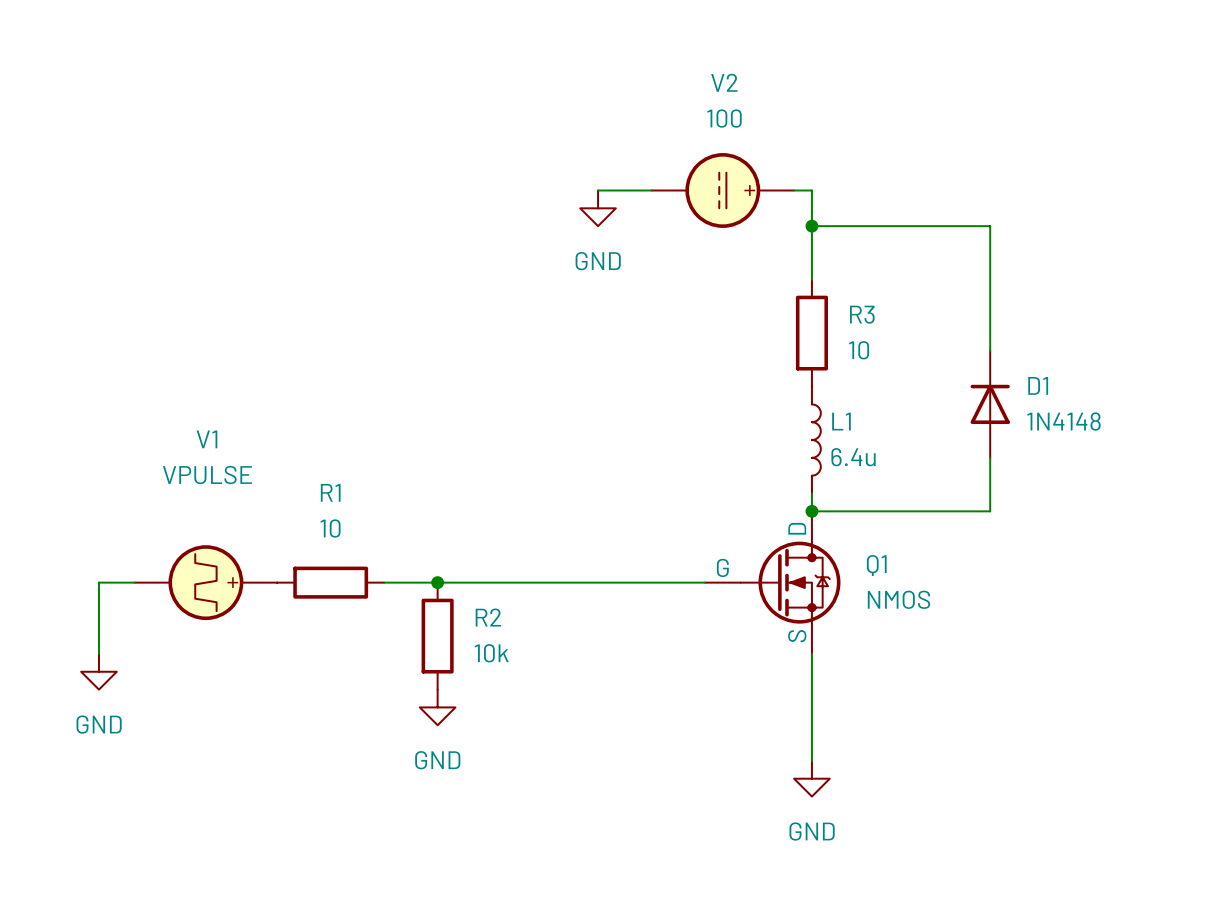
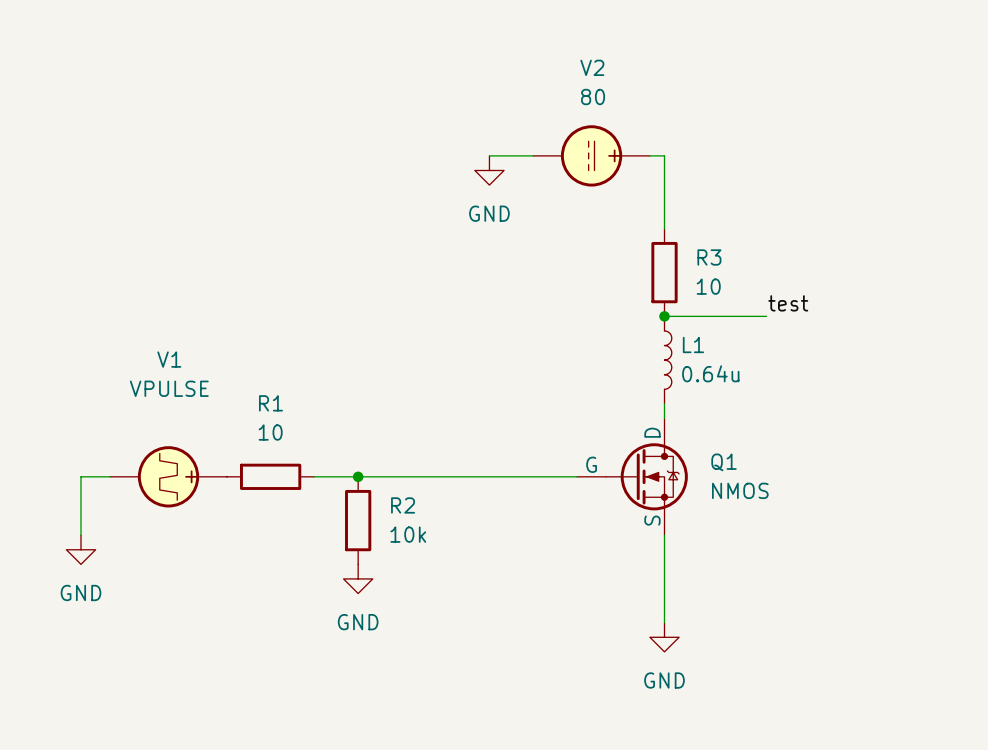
V2 value: 100 (724, 118) -> 80 (593, 97)
wire: (811, 226) (990, 226) (990, 350) -> none
junction: (811, 226) -> none
label: none -> test (788, 303)
wire: none -> (664, 316) (766, 316)
junction: none -> (664, 316)
D1: 1N4148 (990, 404) -> none
L1 value: 6.4u (853, 457) -> 0.64u (710, 373)
wire: (990, 457) (990, 511) (811, 511) -> none
junction: (811, 511) -> none

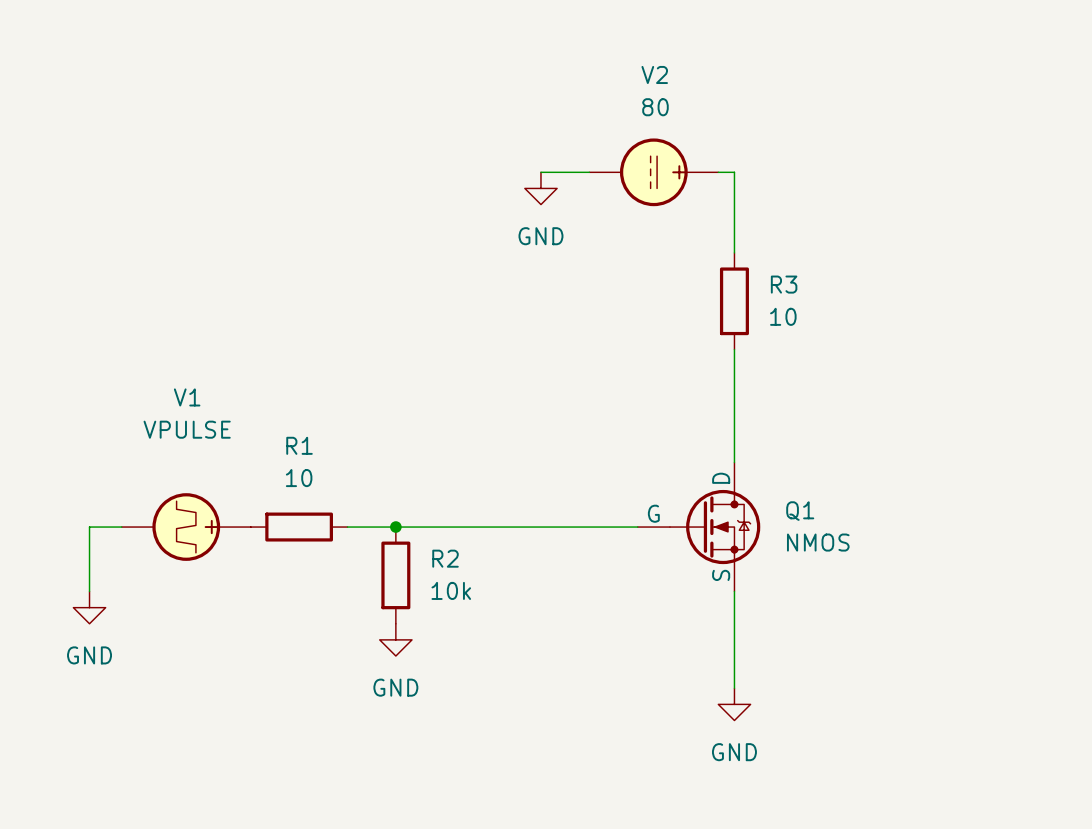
label: test (788, 303) -> none
wire: (664, 316) (766, 316) -> (734, 349) (734, 446)
junction: (664, 316) -> none
L1: 0.64u (668, 360) -> none

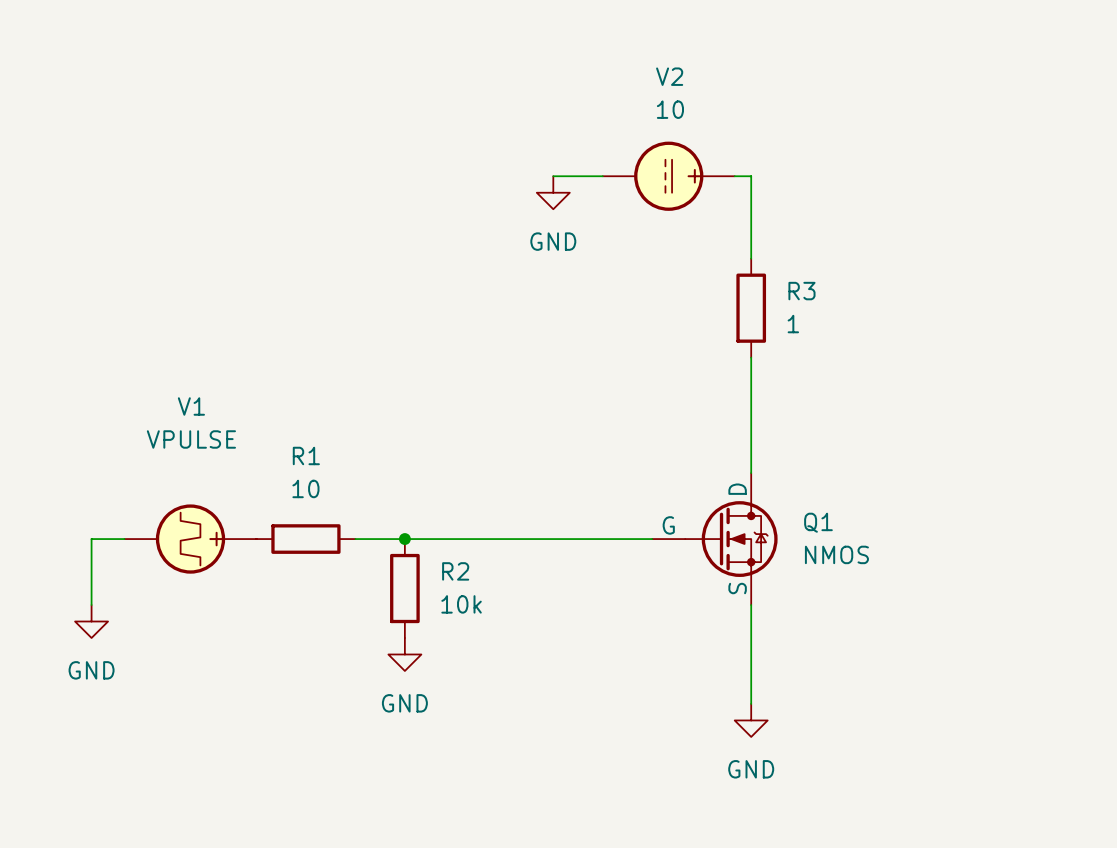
V2 value: 80 (655, 107) -> 10 (670, 109)
R3 value: 10 (783, 316) -> 1 (793, 324)

